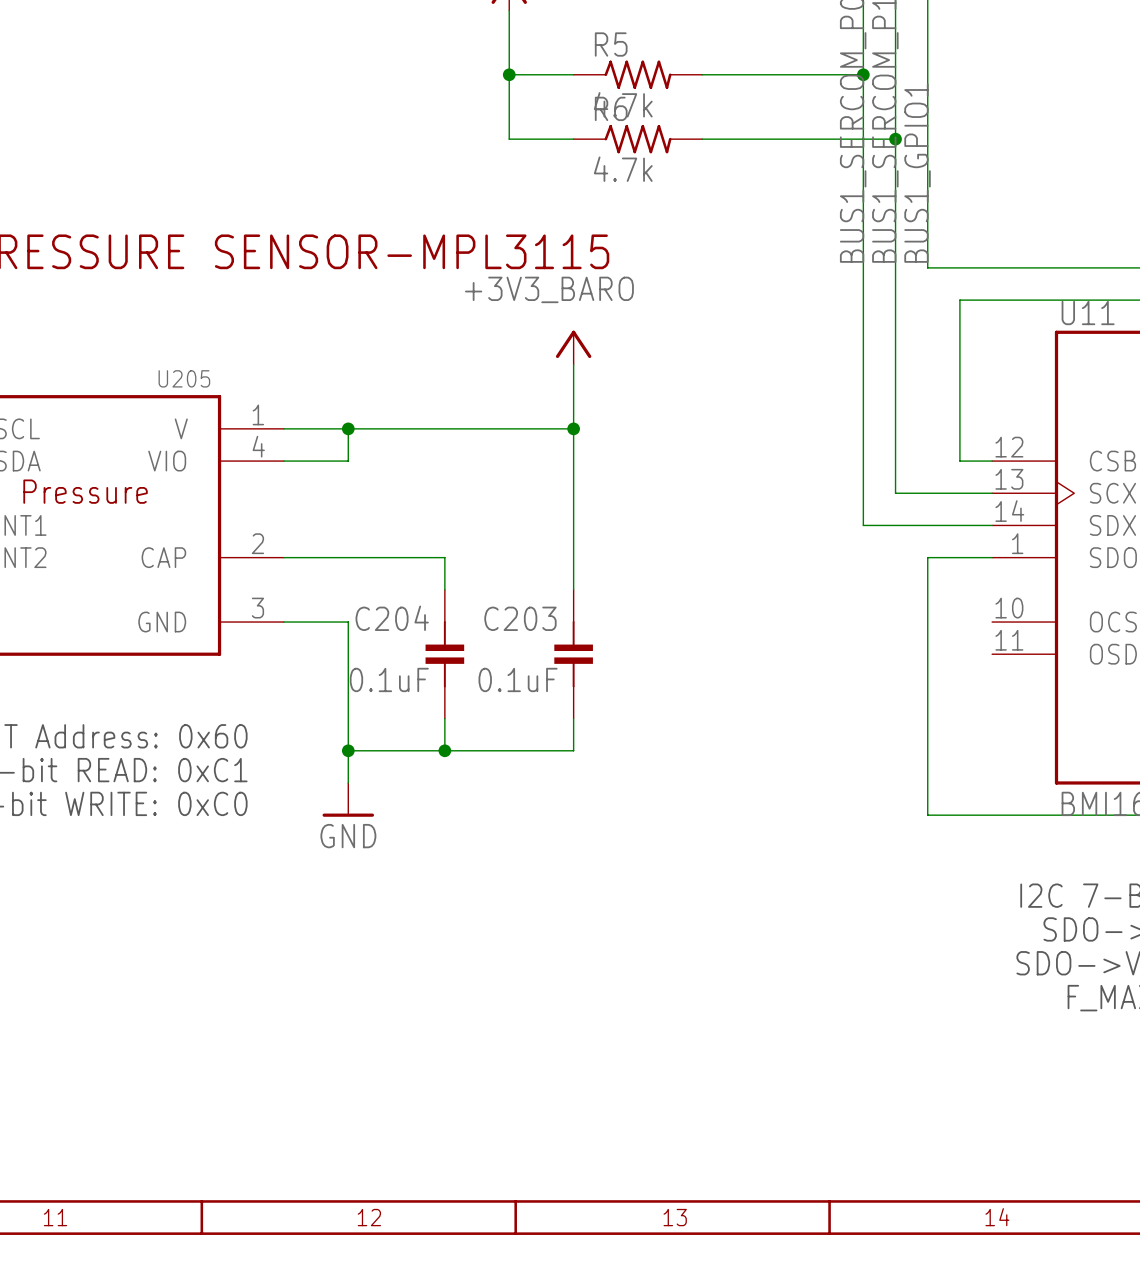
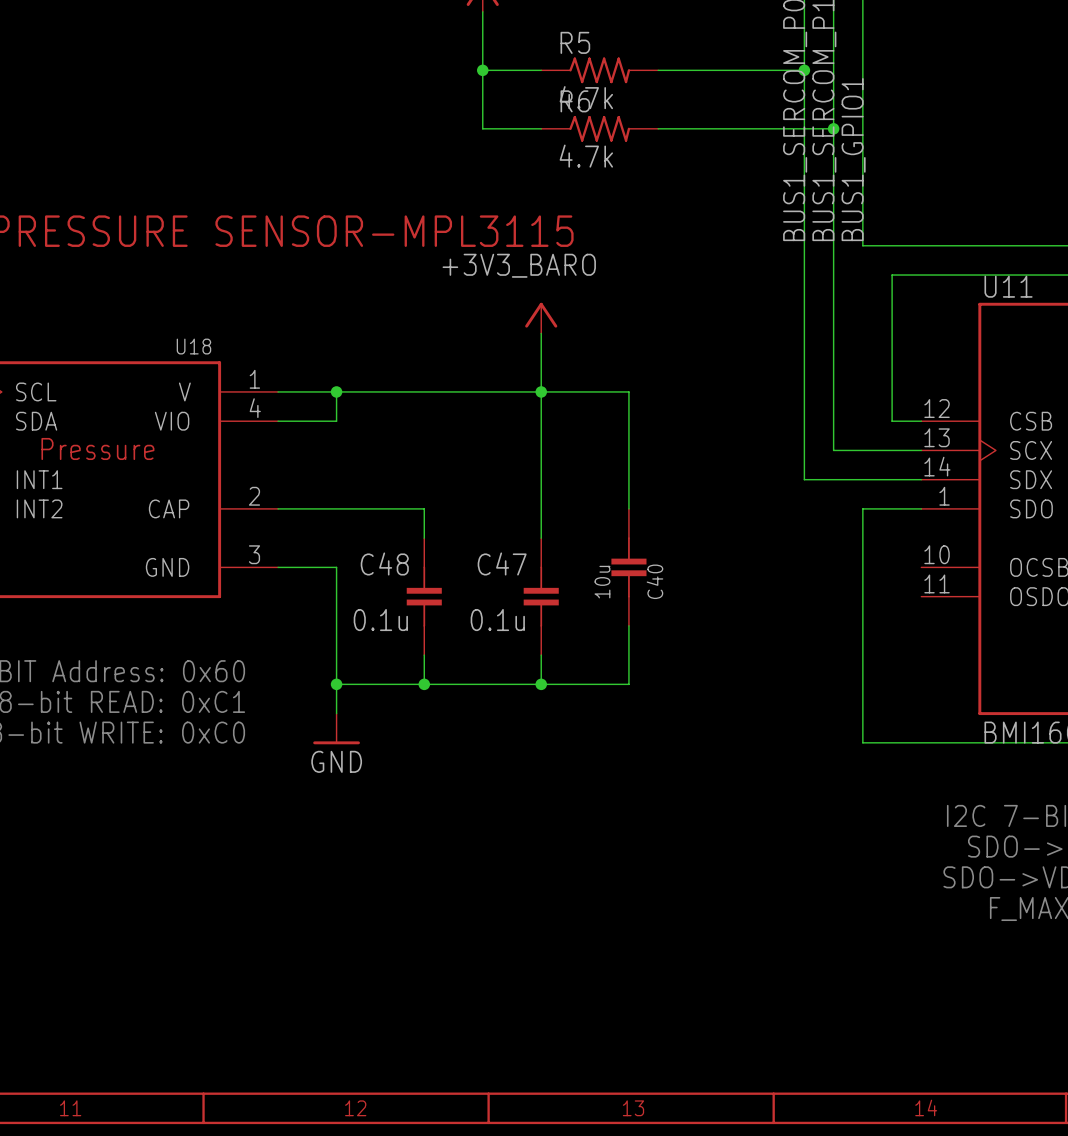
U205 name: U205 (184, 378) -> U18 (193, 346)
wire: none -> (541, 391) (628, 391) (628, 508)
C204 name: C204 (392, 618) -> C48 (384, 563)
C203 name: C203 (520, 618) -> C47 (502, 563)
C40: none -> 10u (628, 567)
C204 value: 0.1uF (389, 679) -> 0.1u (380, 620)
C203 value: 0.1uF (518, 679) -> 0.1u (497, 620)
wire: none -> (628, 625) (628, 684) (541, 684)
junction: none -> (541, 684)

